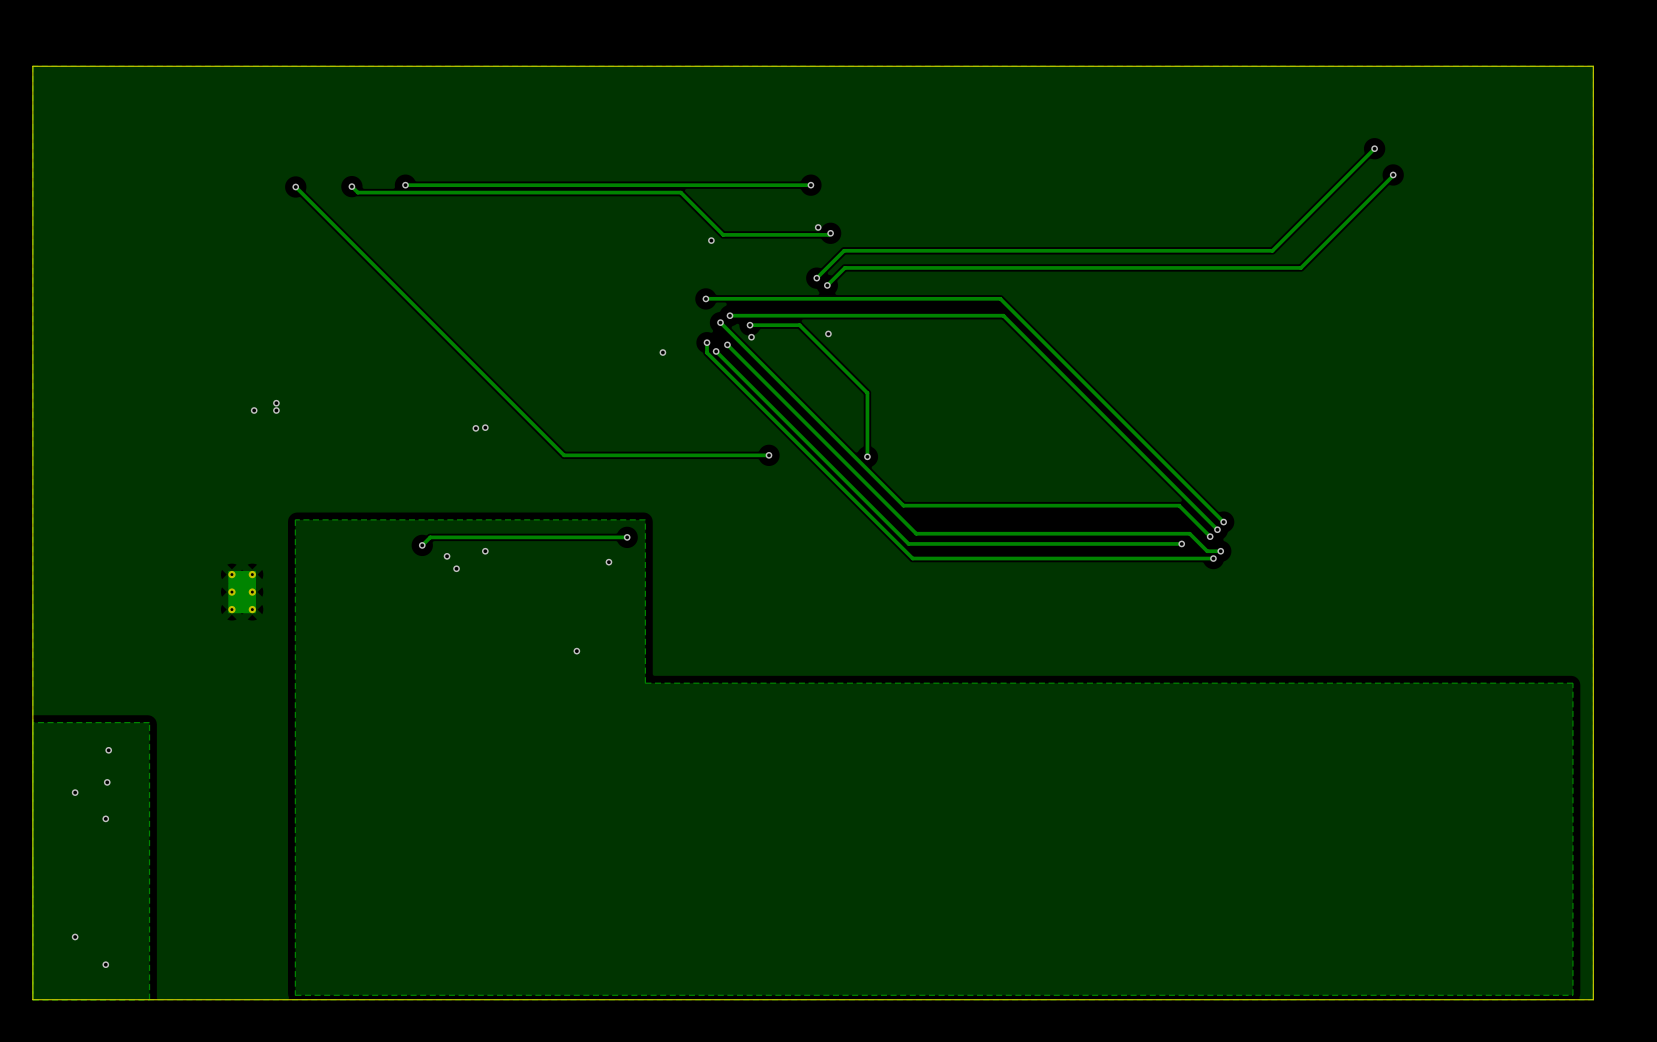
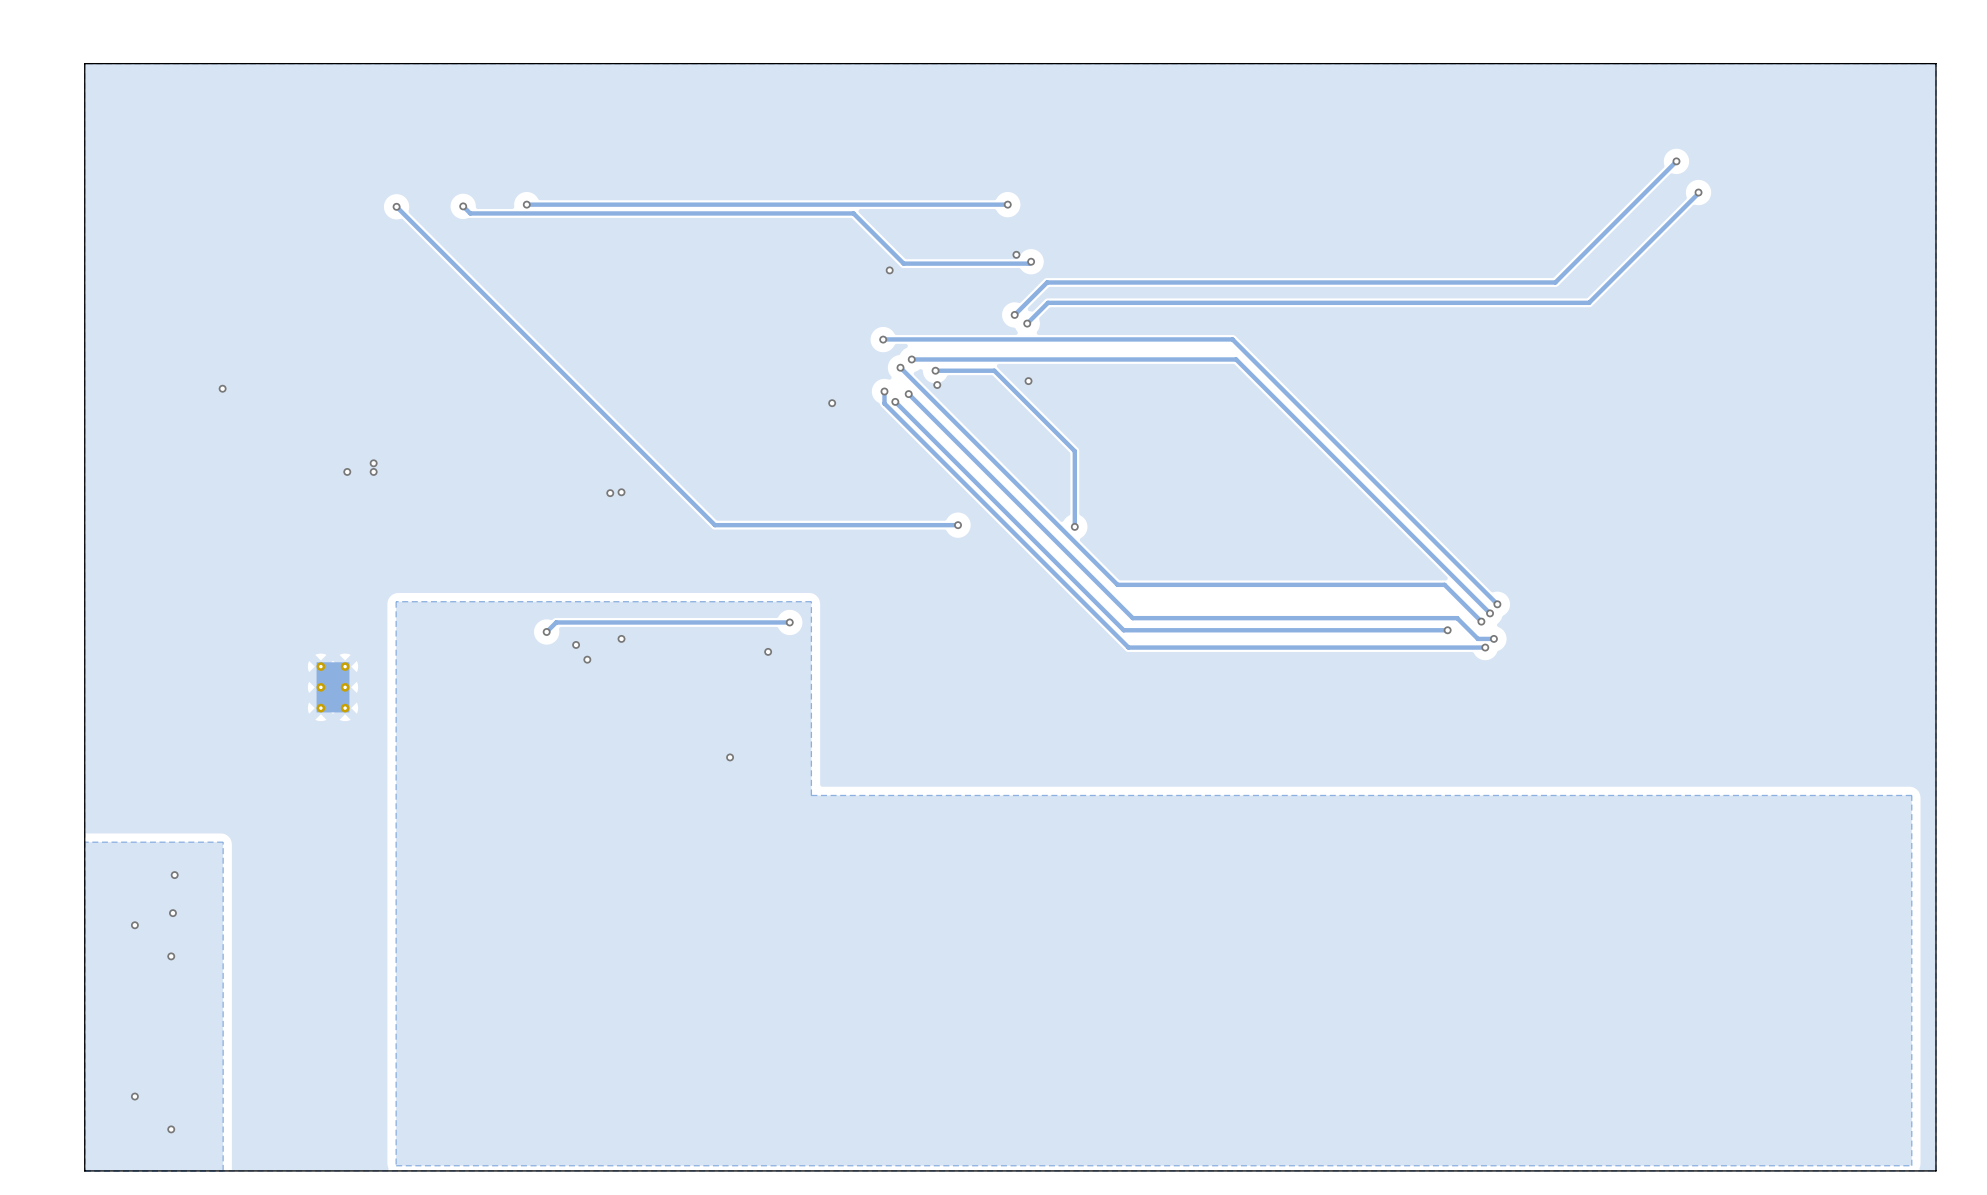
via: none -> (222, 388)

